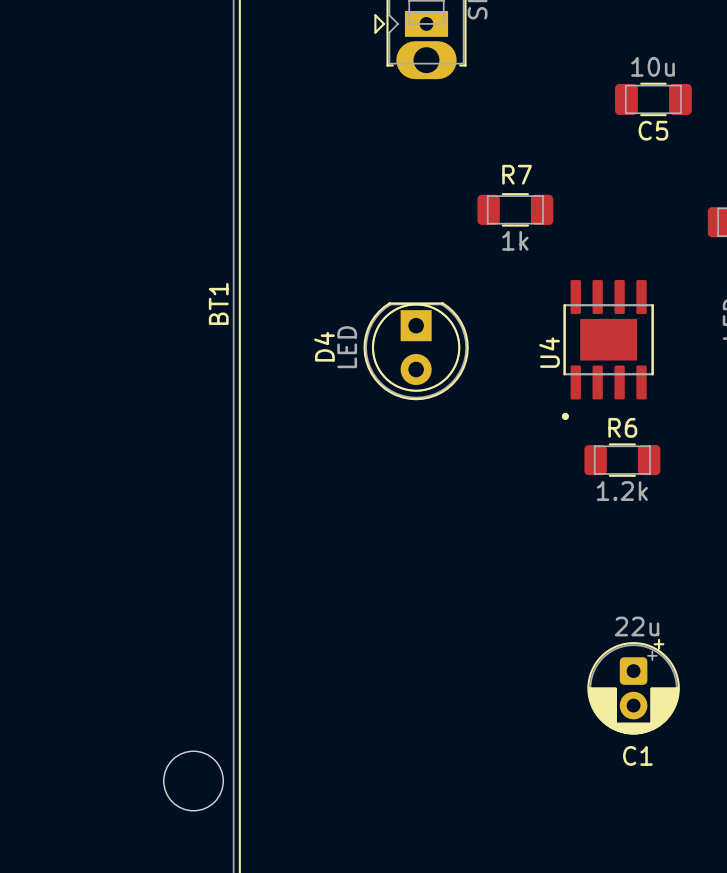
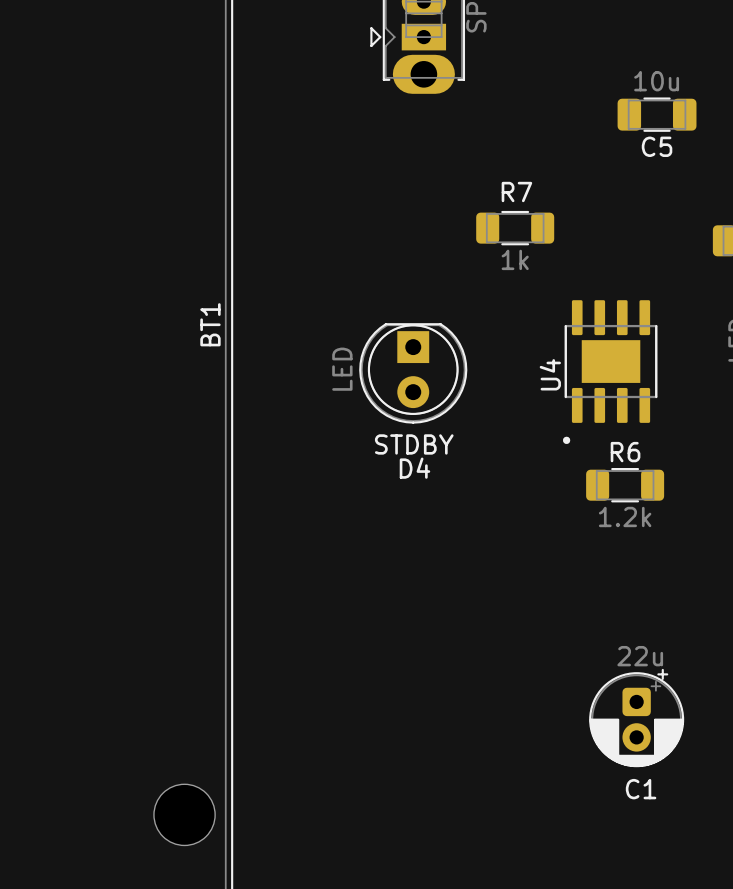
D4 name rotation: 0° (324, 346) -> 90° clockwise (414, 468)
D4 name position: D4 (324, 346) -> D4 (414, 468)
text: none -> STDBY (414, 444)

